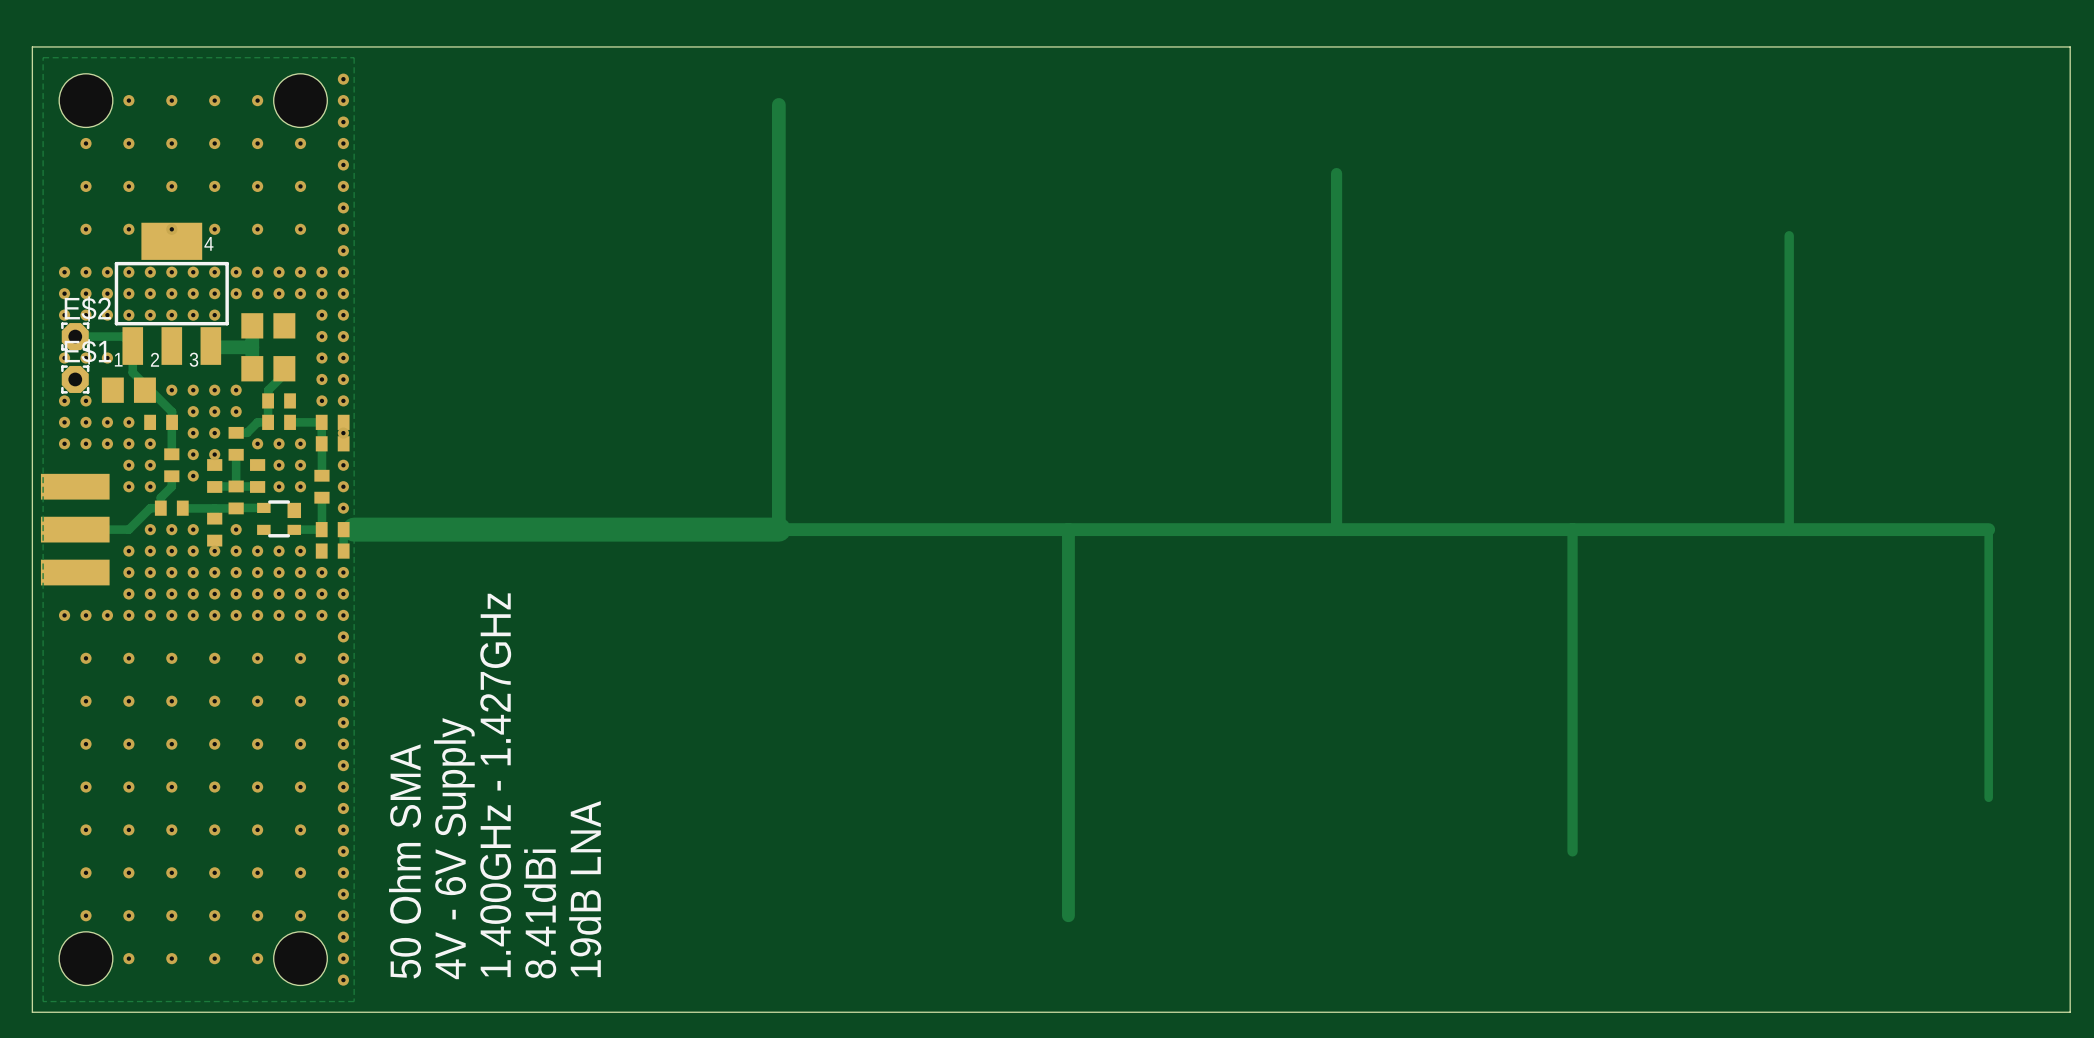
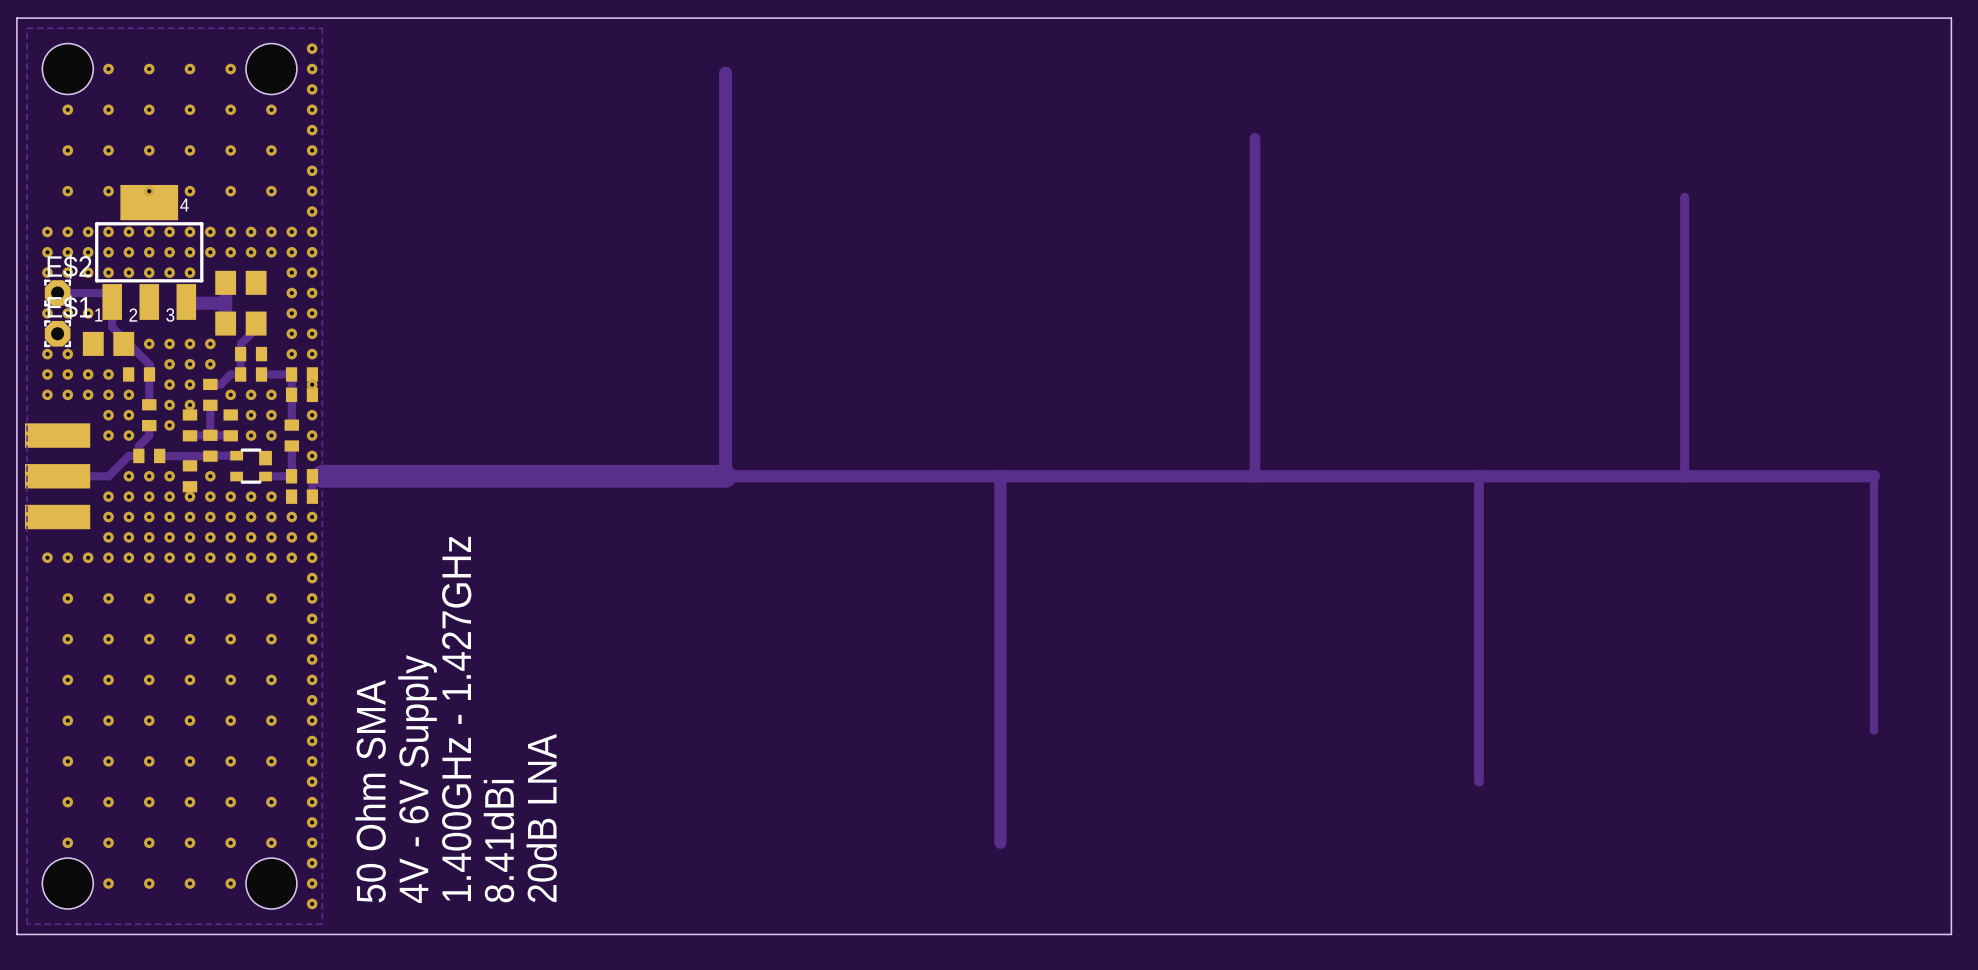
text: 19dB LNA (585, 889) -> 20dB LNA (541, 818)

